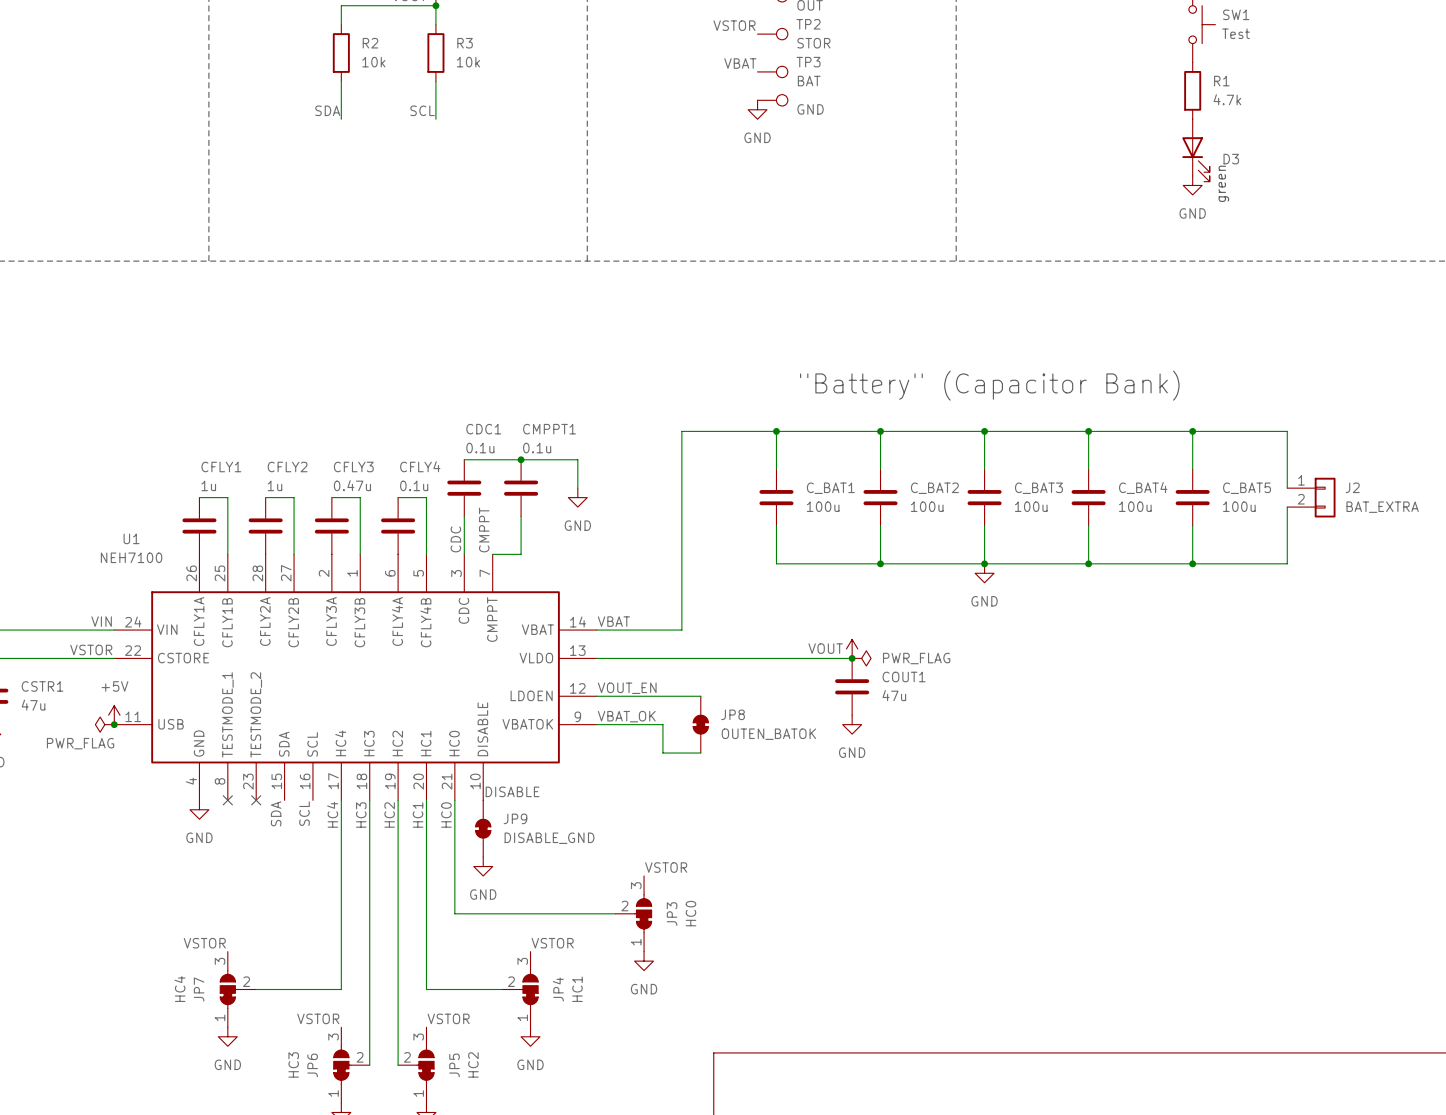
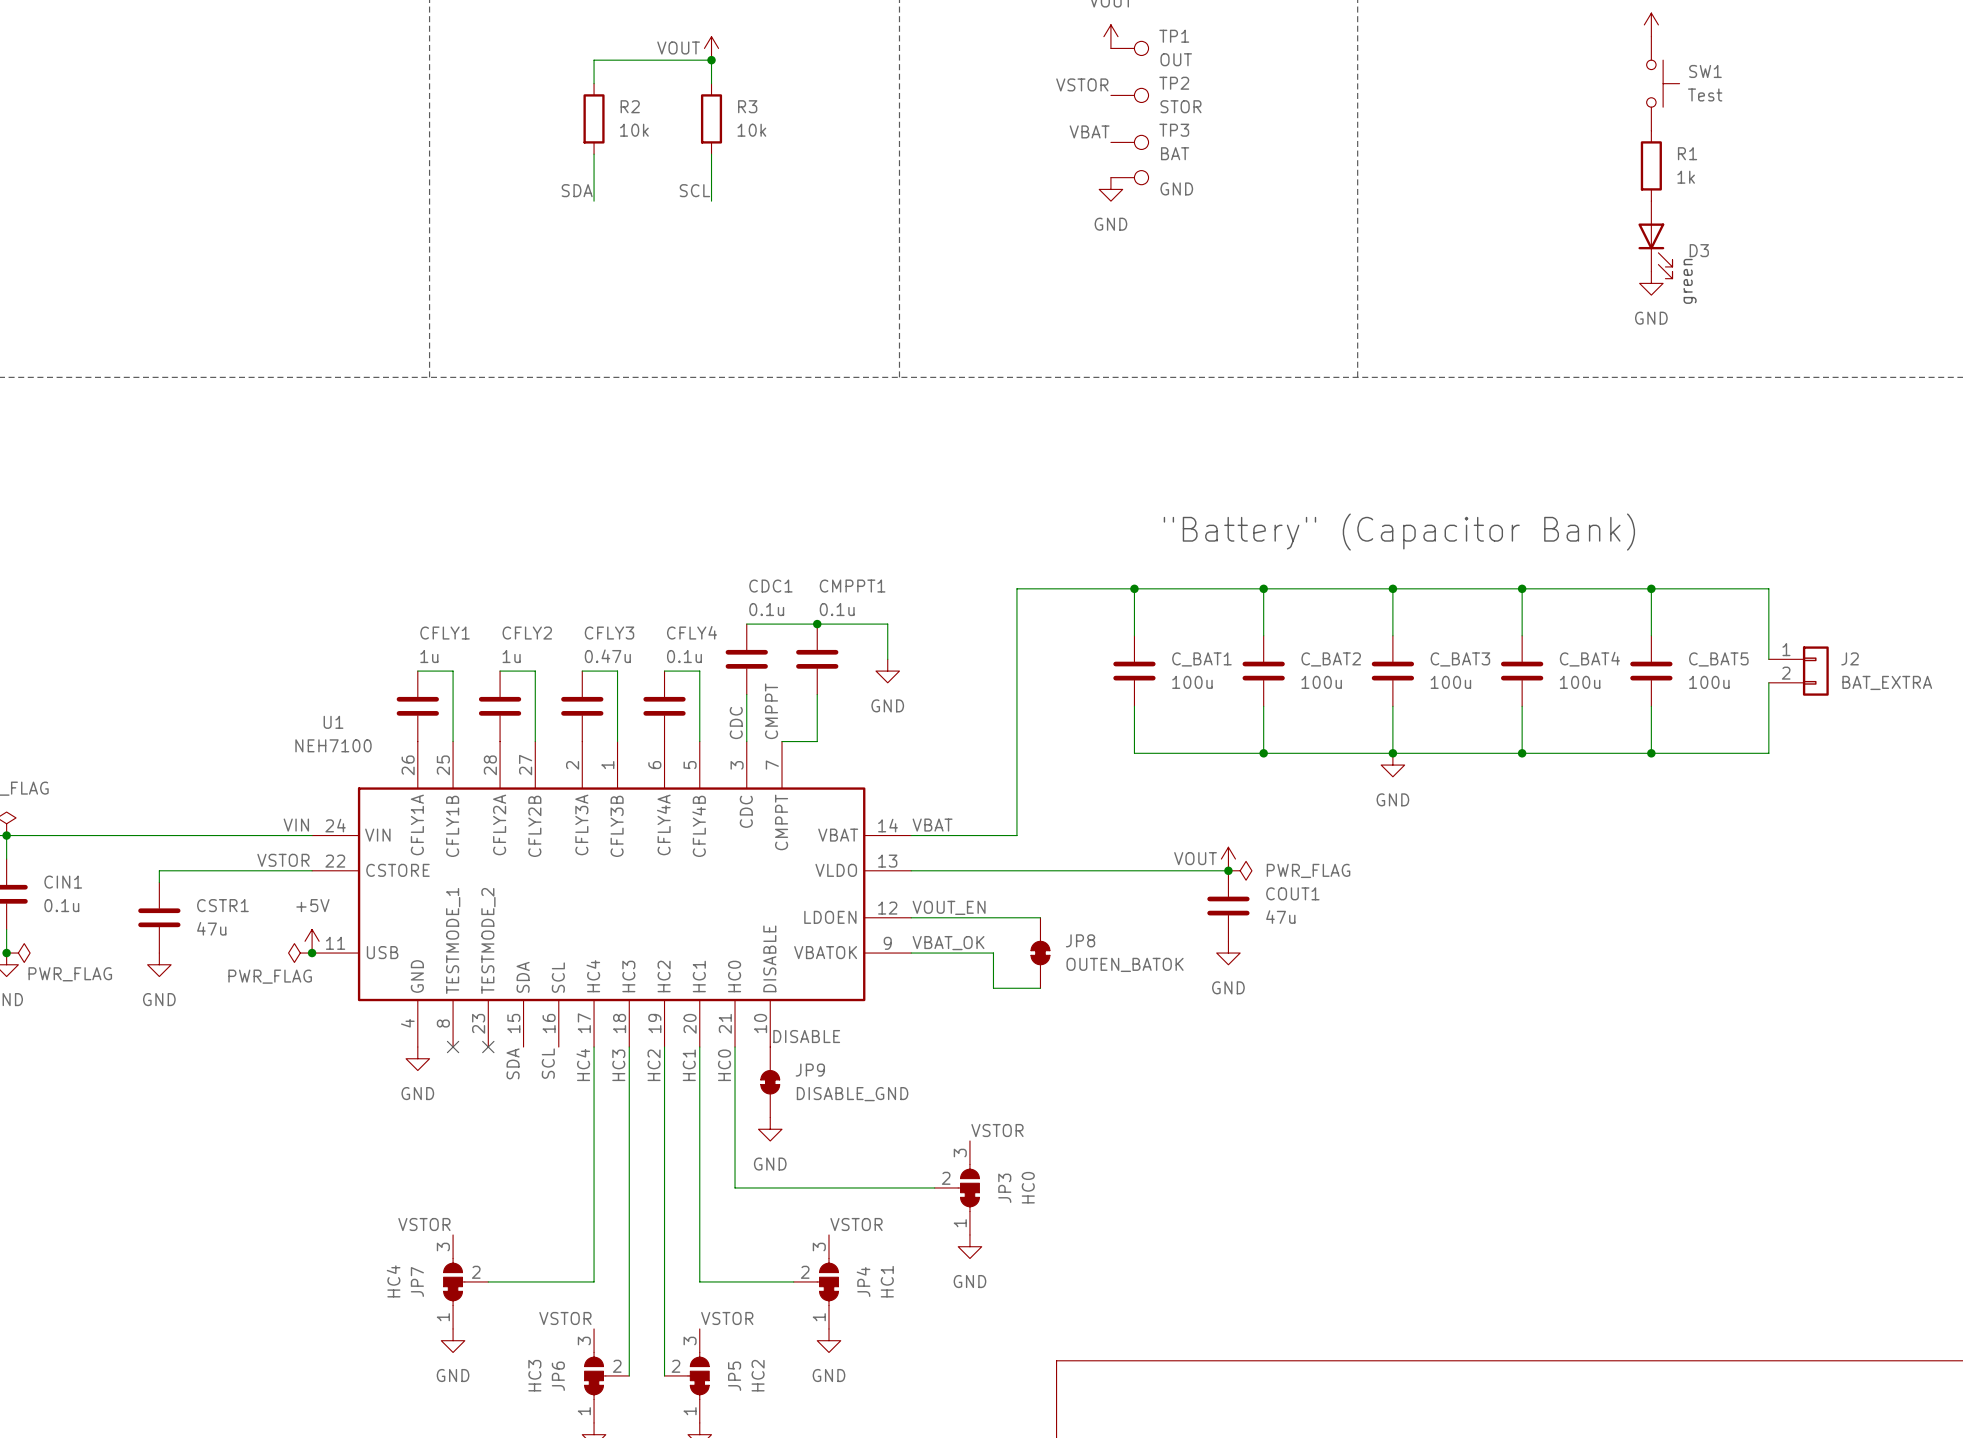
R1 value: 4.7k (1227, 99) -> 1k (1686, 177)

